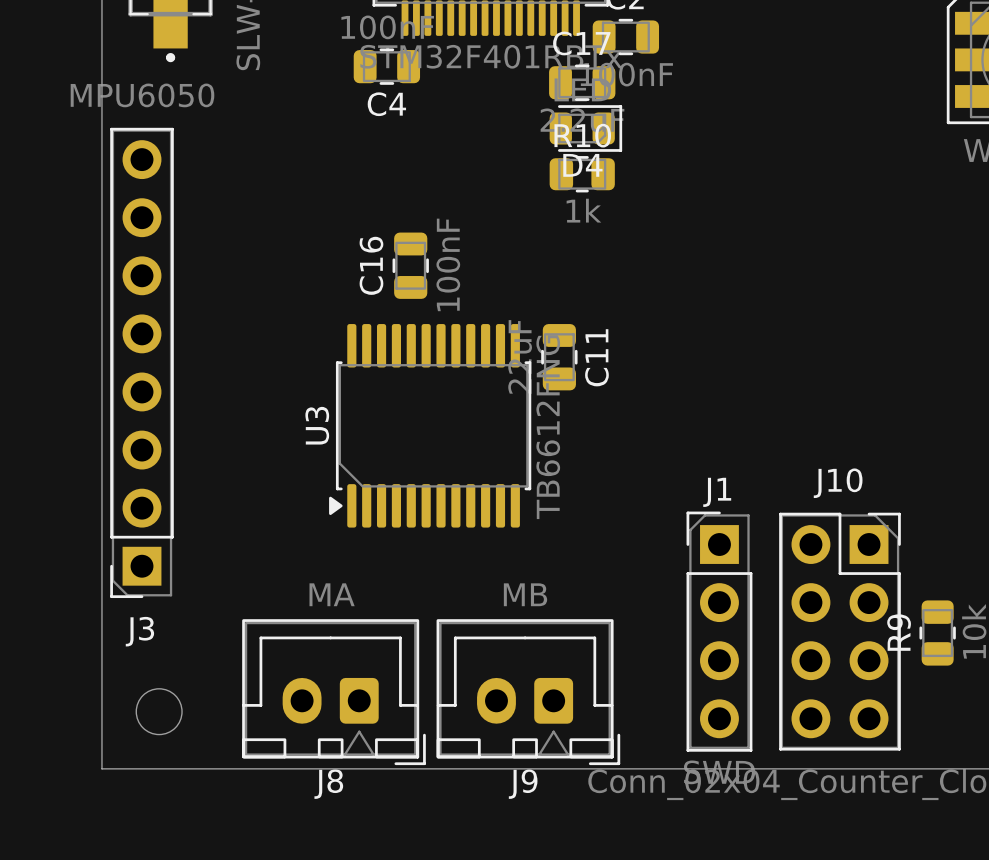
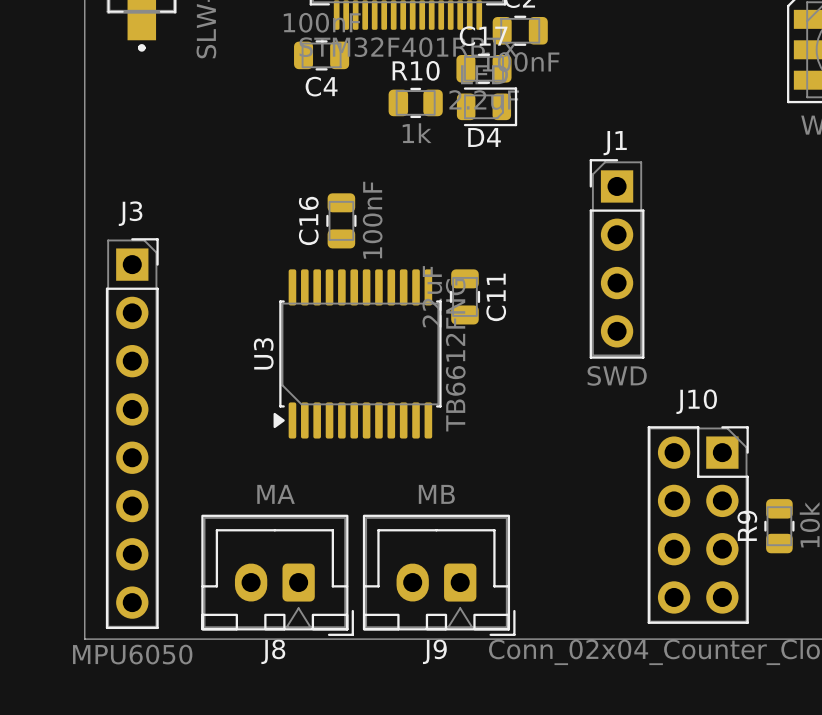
R10 position: (582, 174) -> (415, 102)
J3 rotation: 0° (142, 362) -> 180° (132, 433)
J1 position: (719, 631) -> (617, 258)
round board edge: [135, 688, 183, 736] -> none

